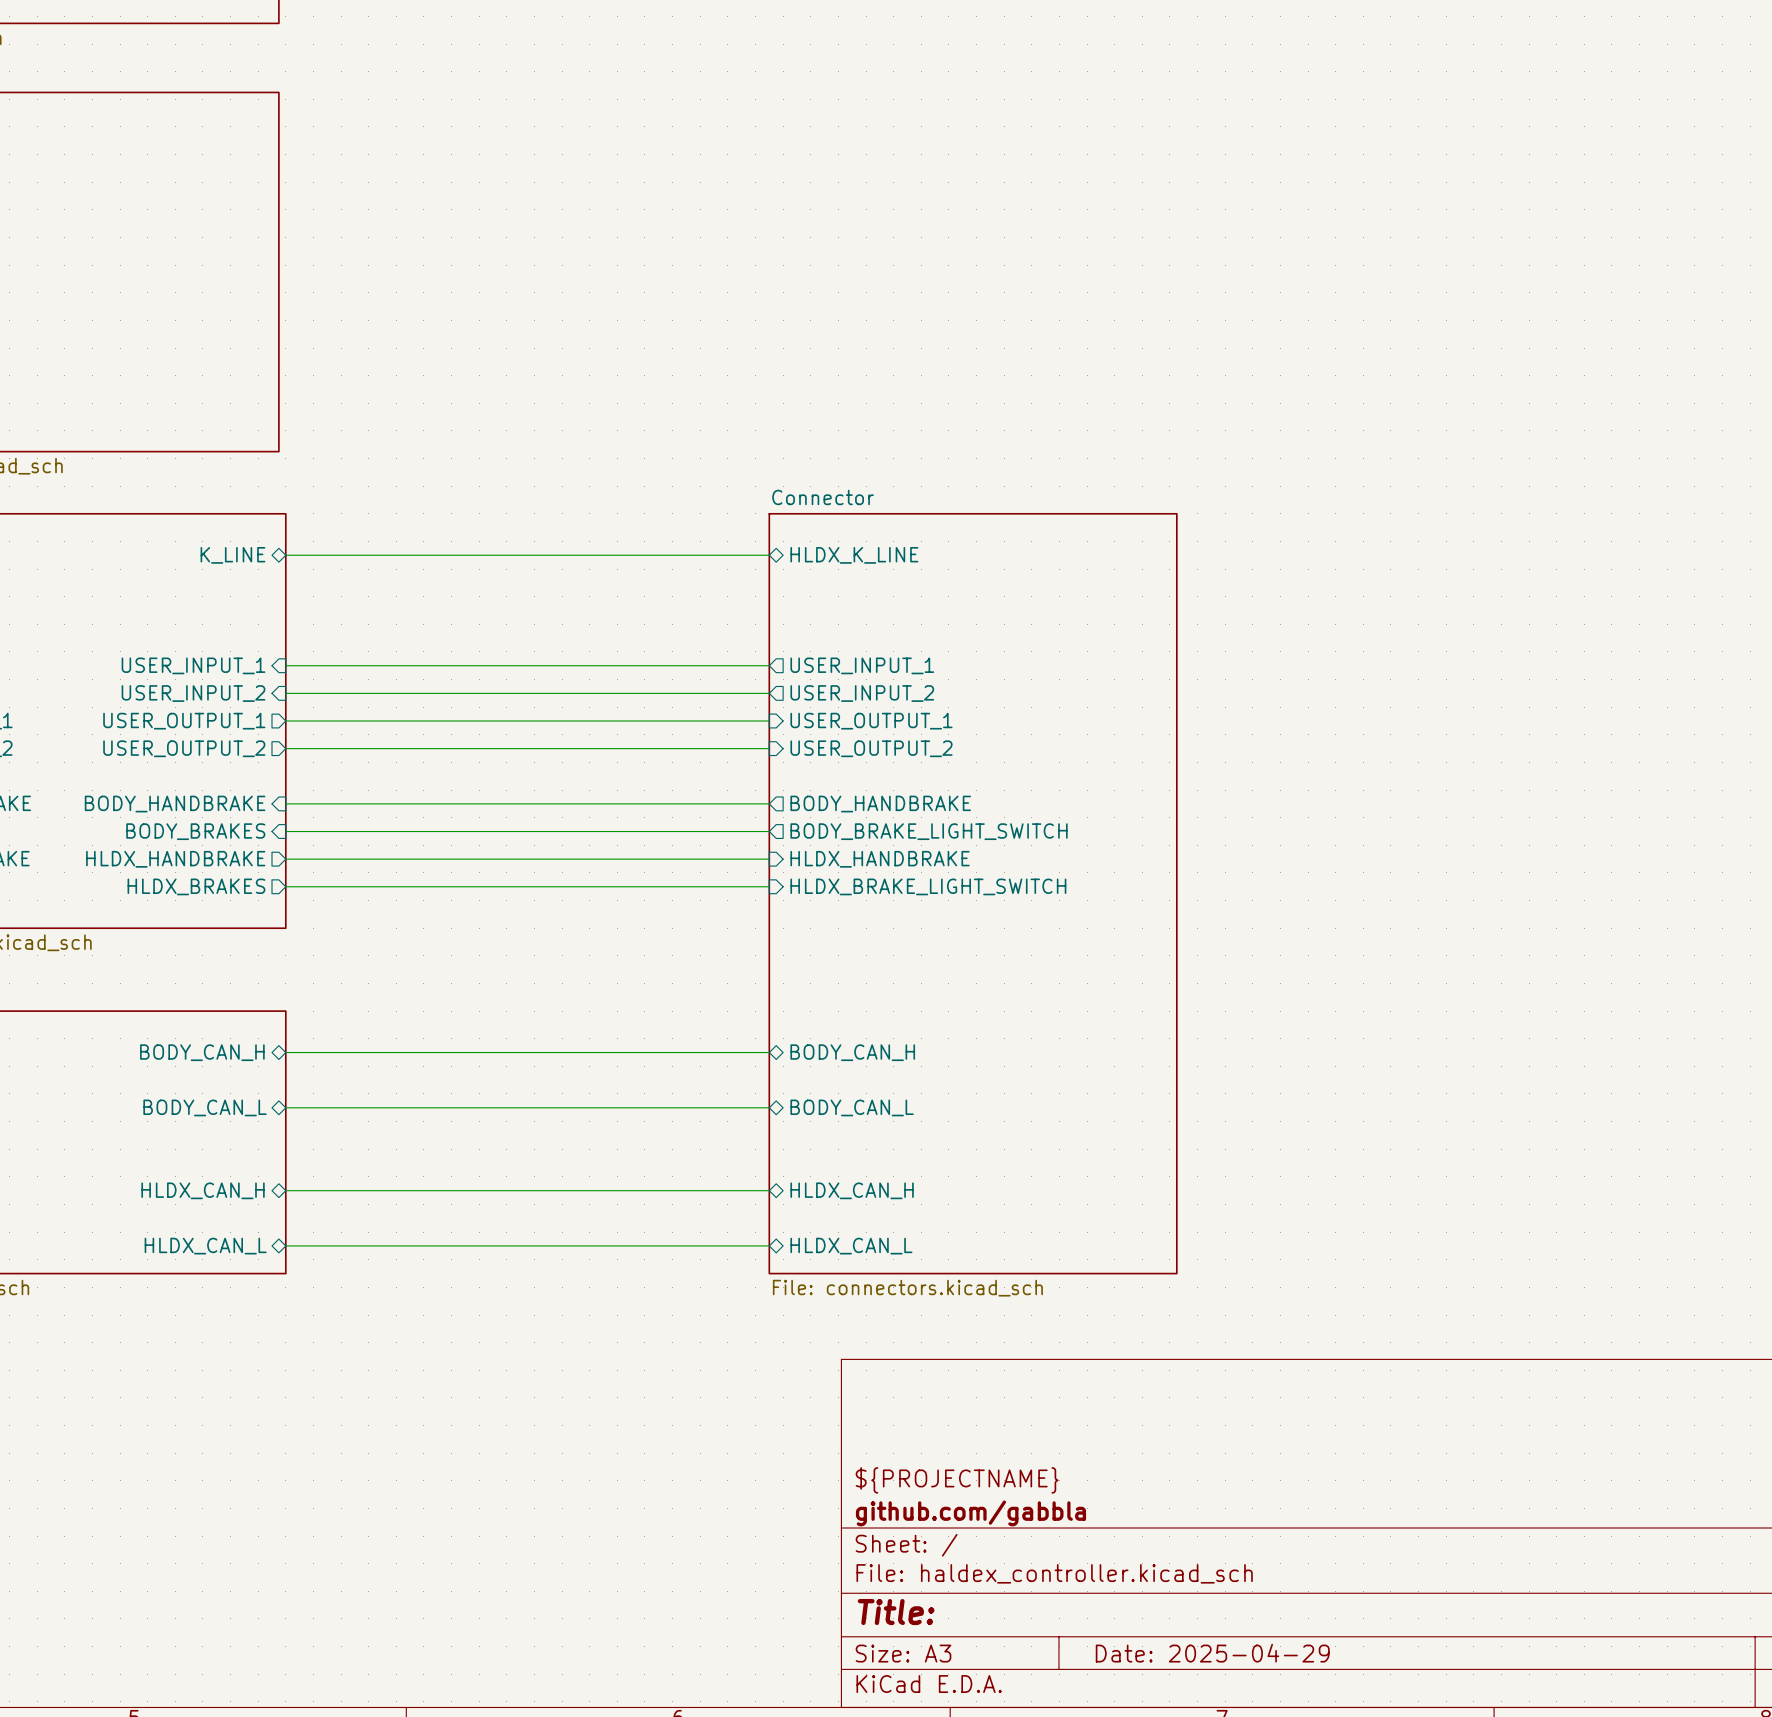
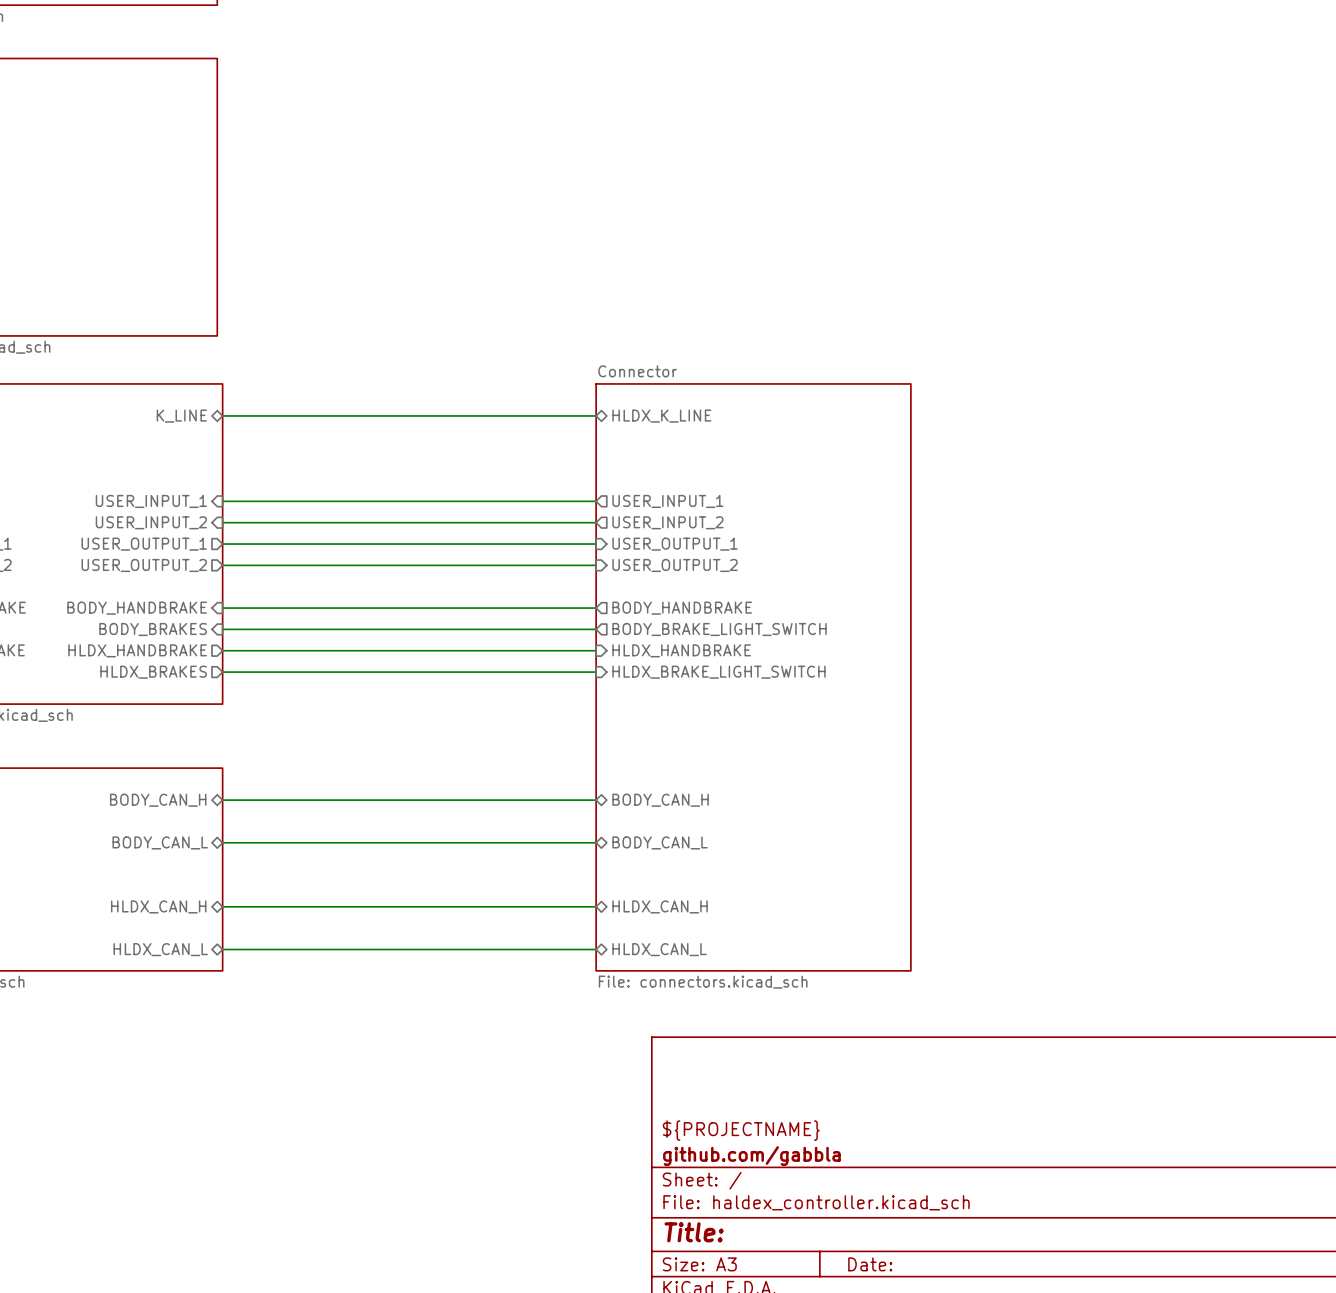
title block: Date: 2025-04-29 (1212, 1653) -> Date: (870, 1264)

